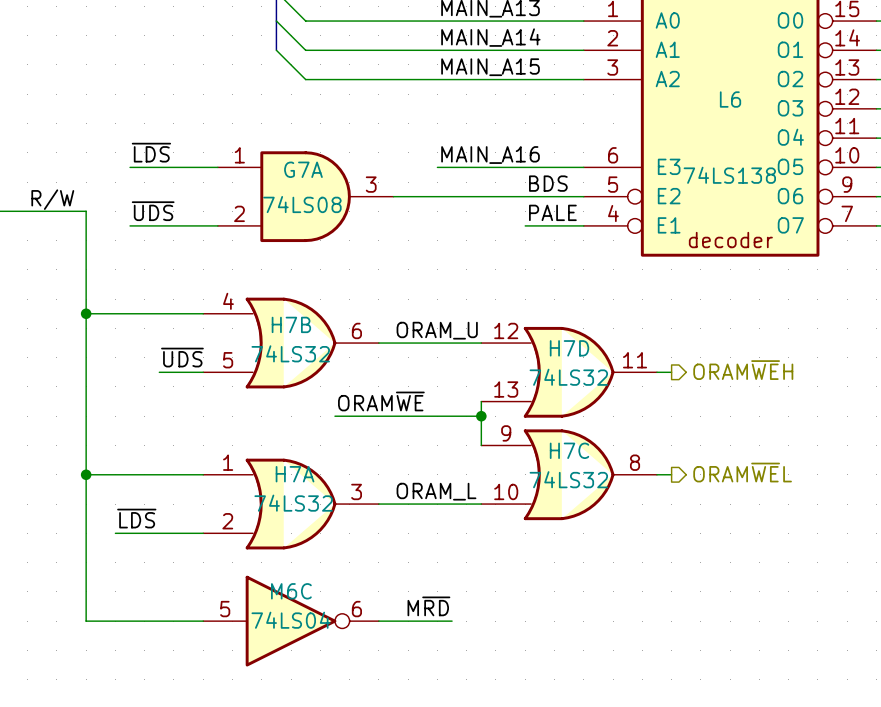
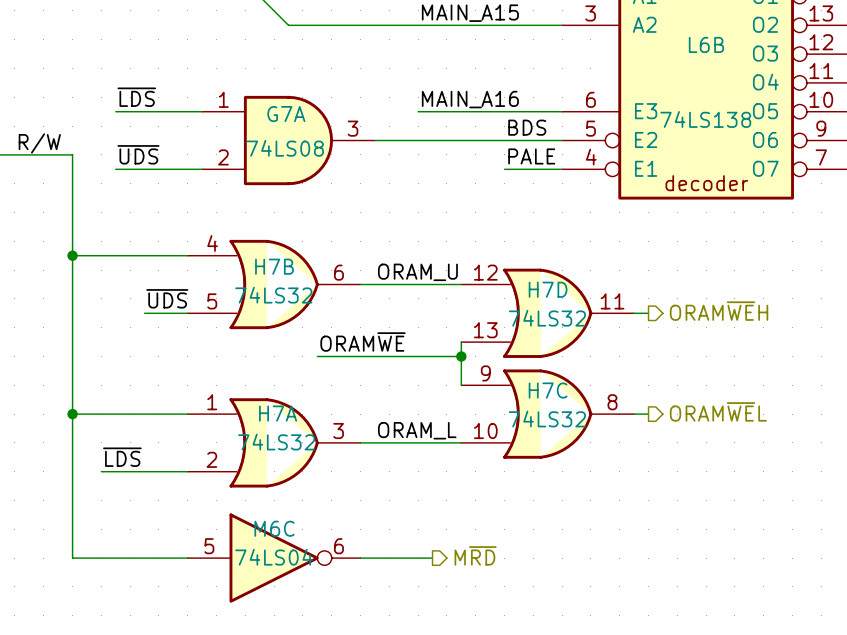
L6 name: L6 (730, 99) -> L6B (706, 44)
label: M~{RD} (428, 606) -> none
hierarchical label: none -> M~{RD} (475, 555)

